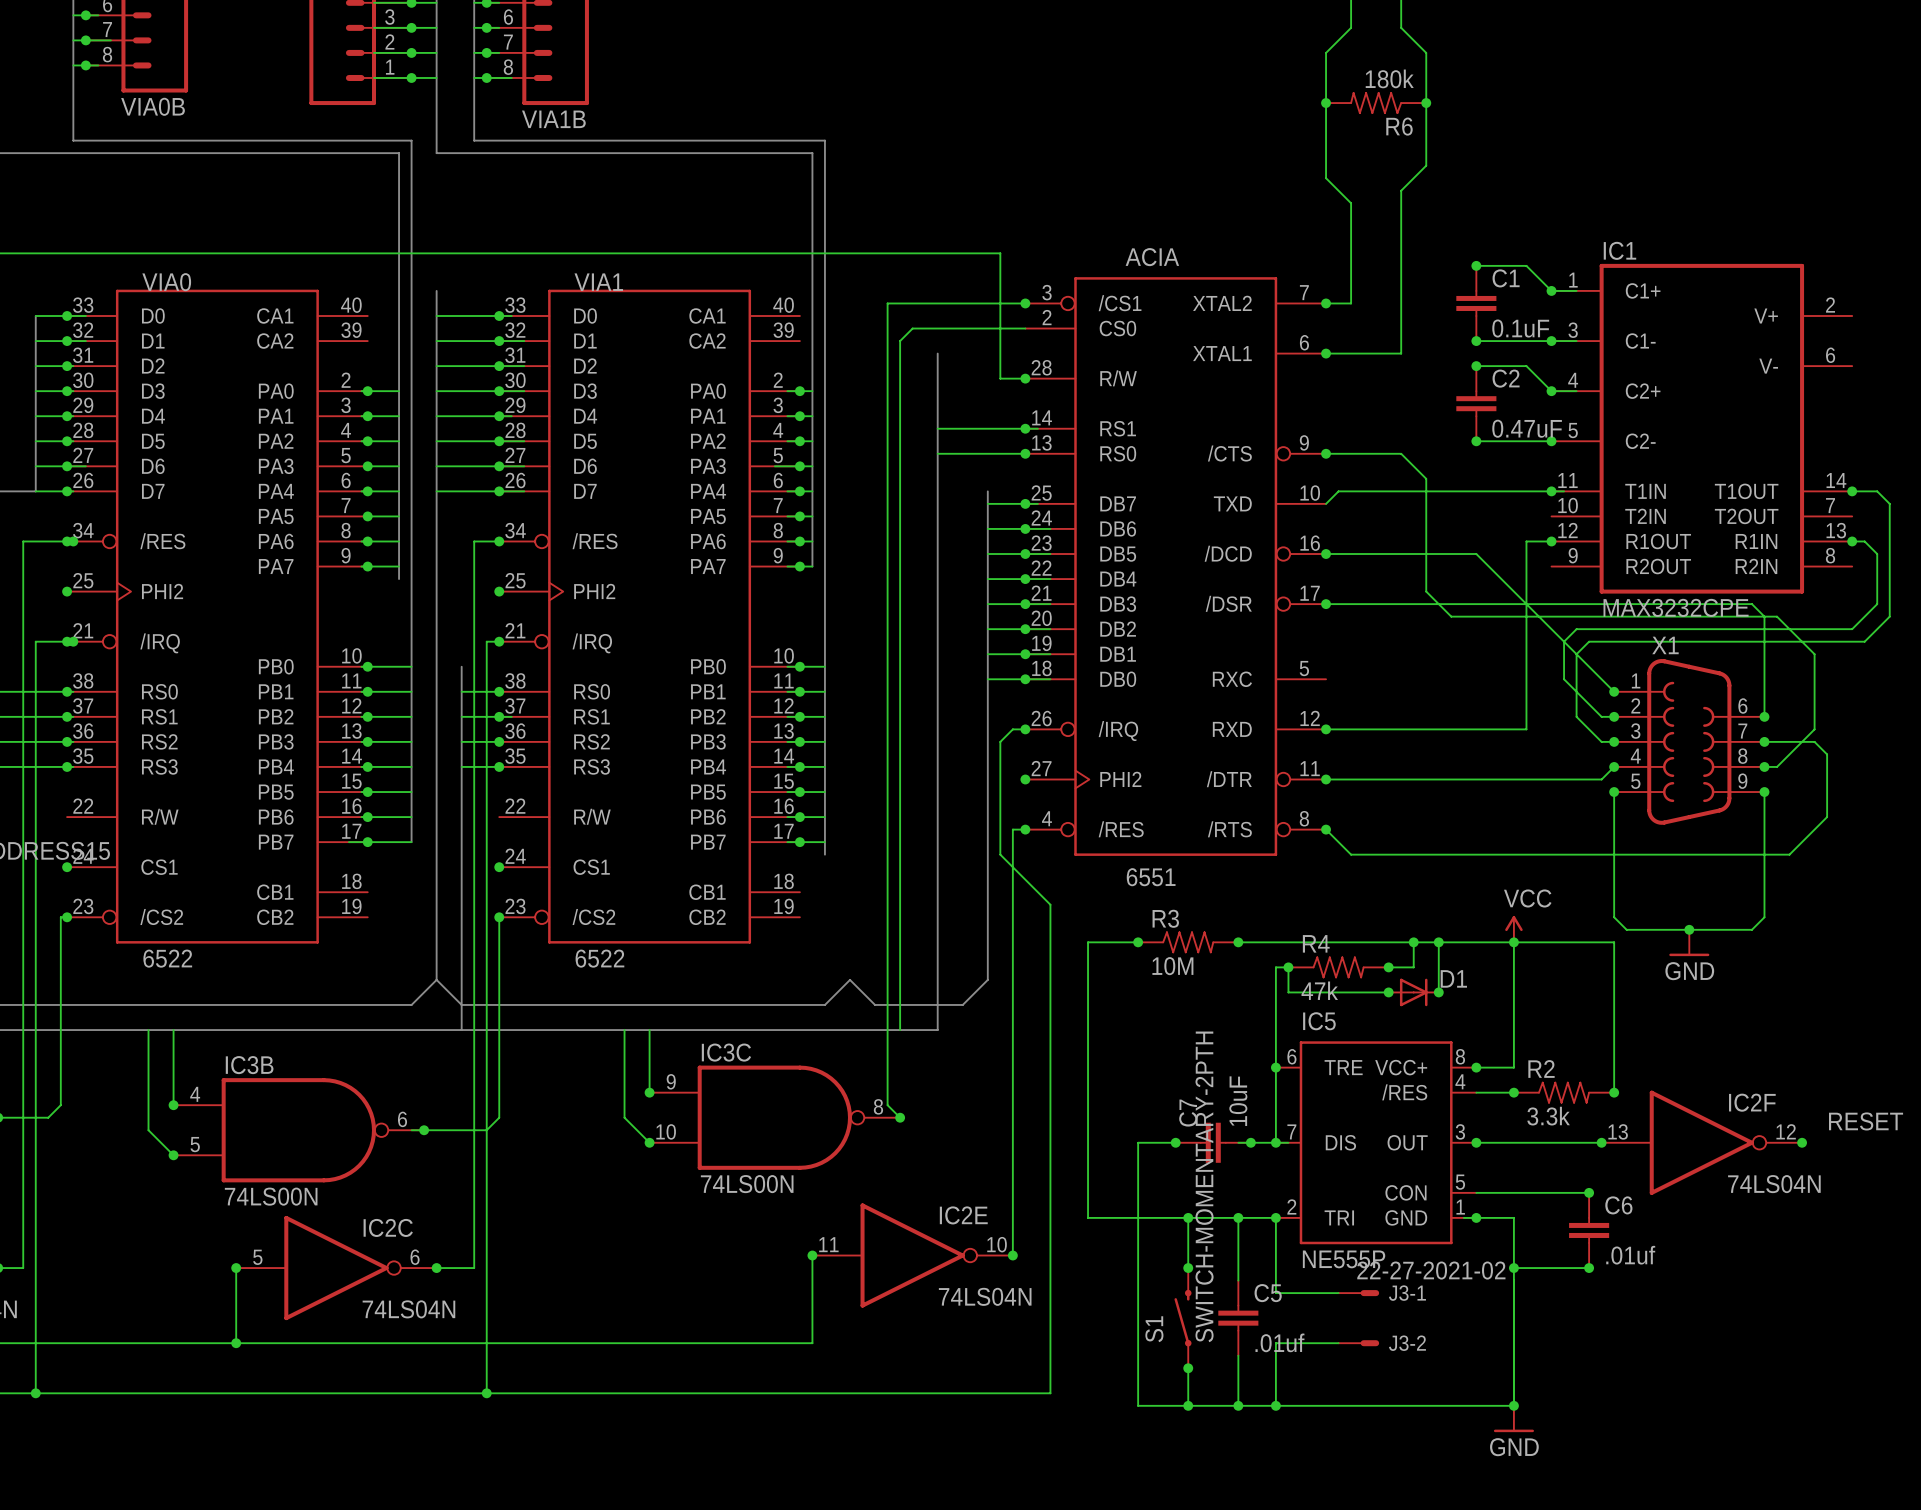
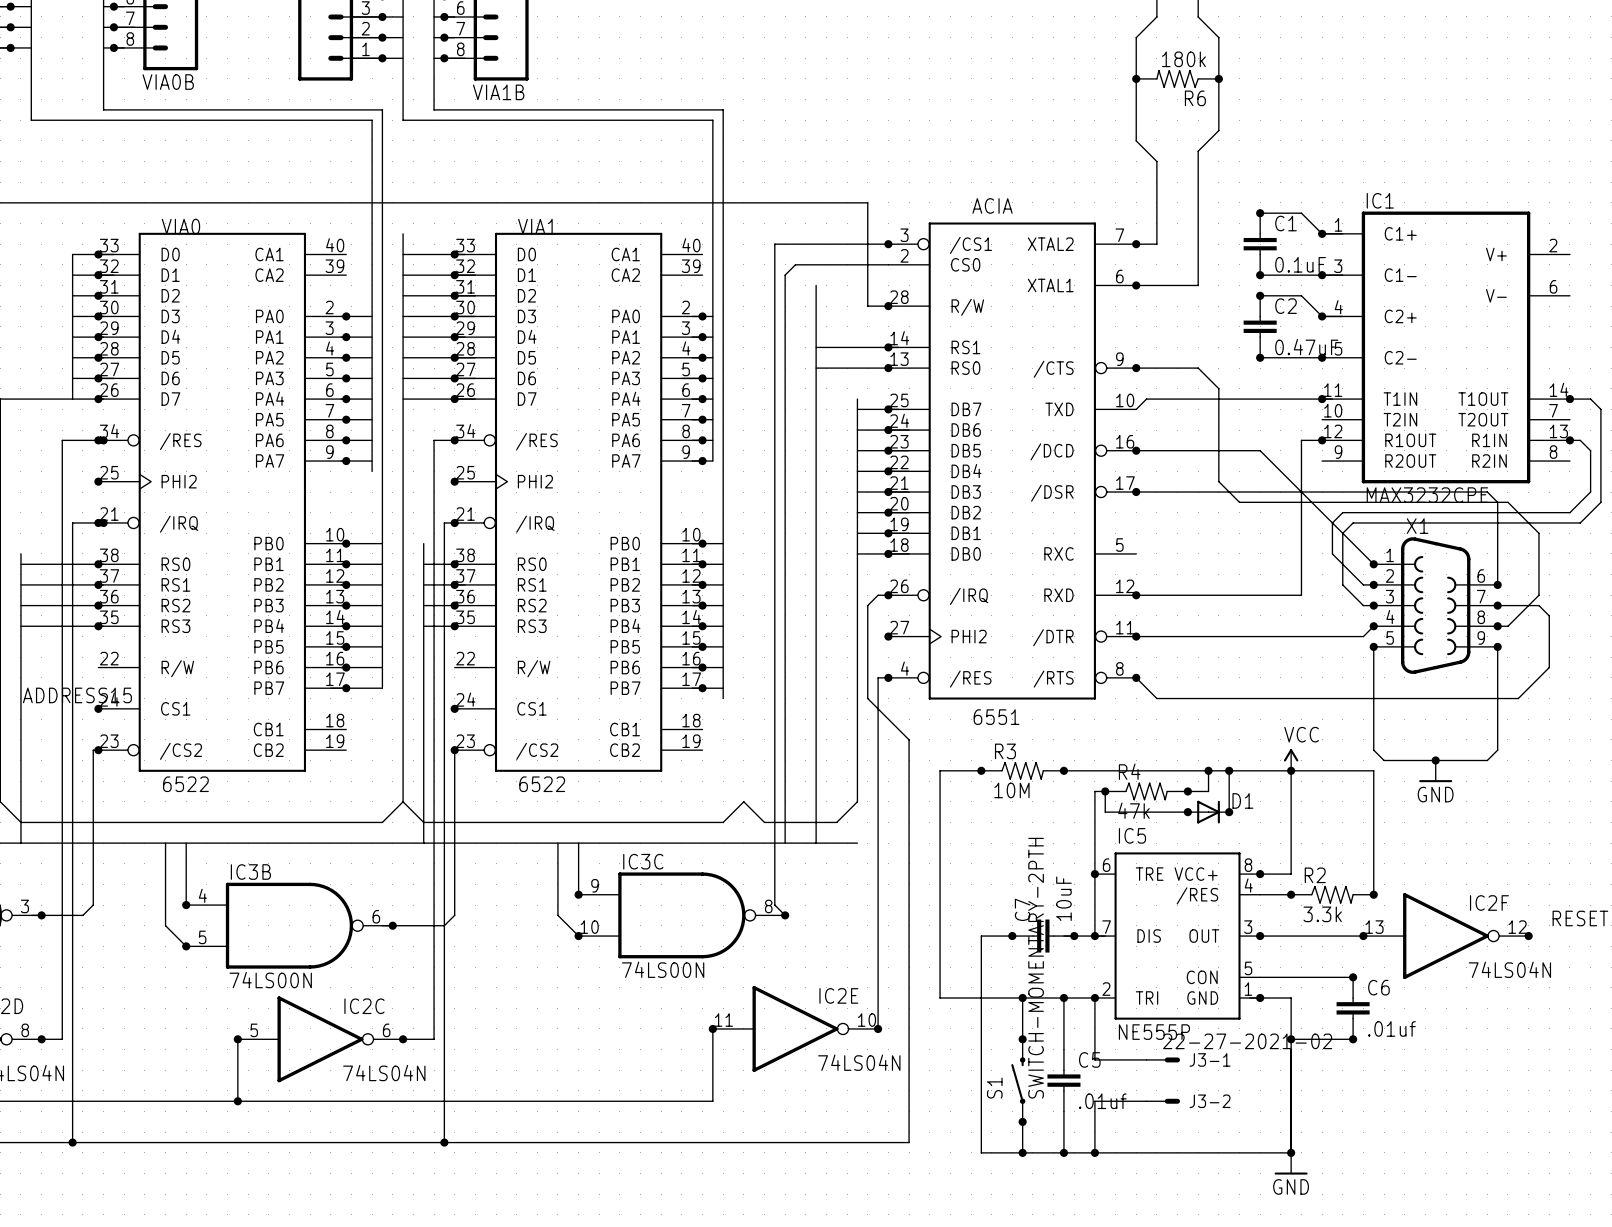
bus: none -> (816, 843) (857, 843)

